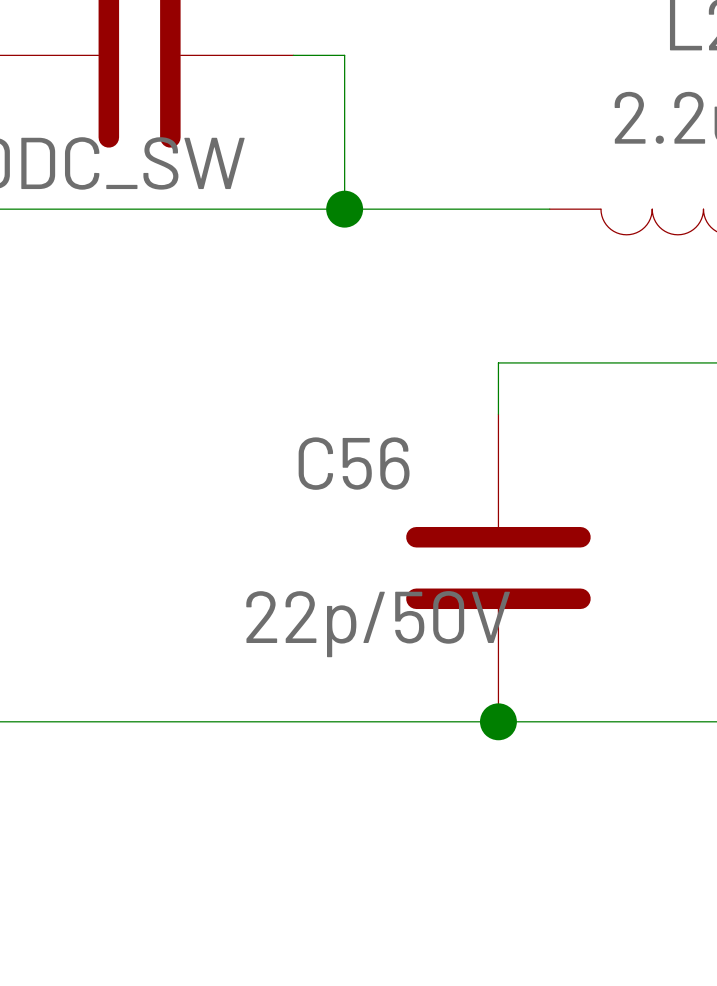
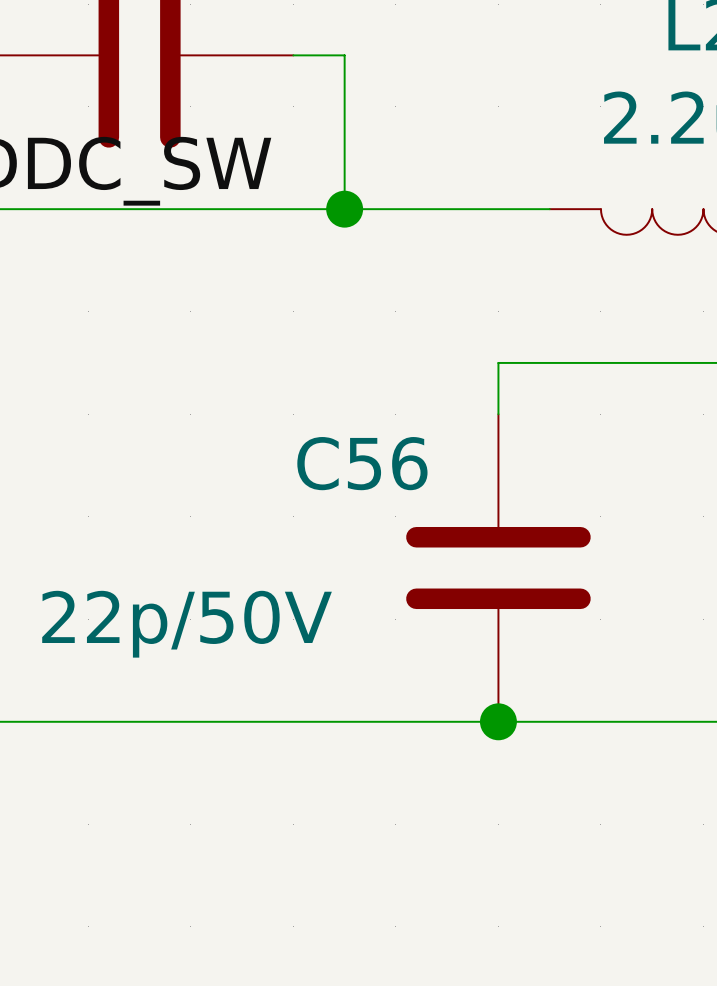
C56 value position: 22p/50V (378, 624) -> 22p/50V (187, 624)

